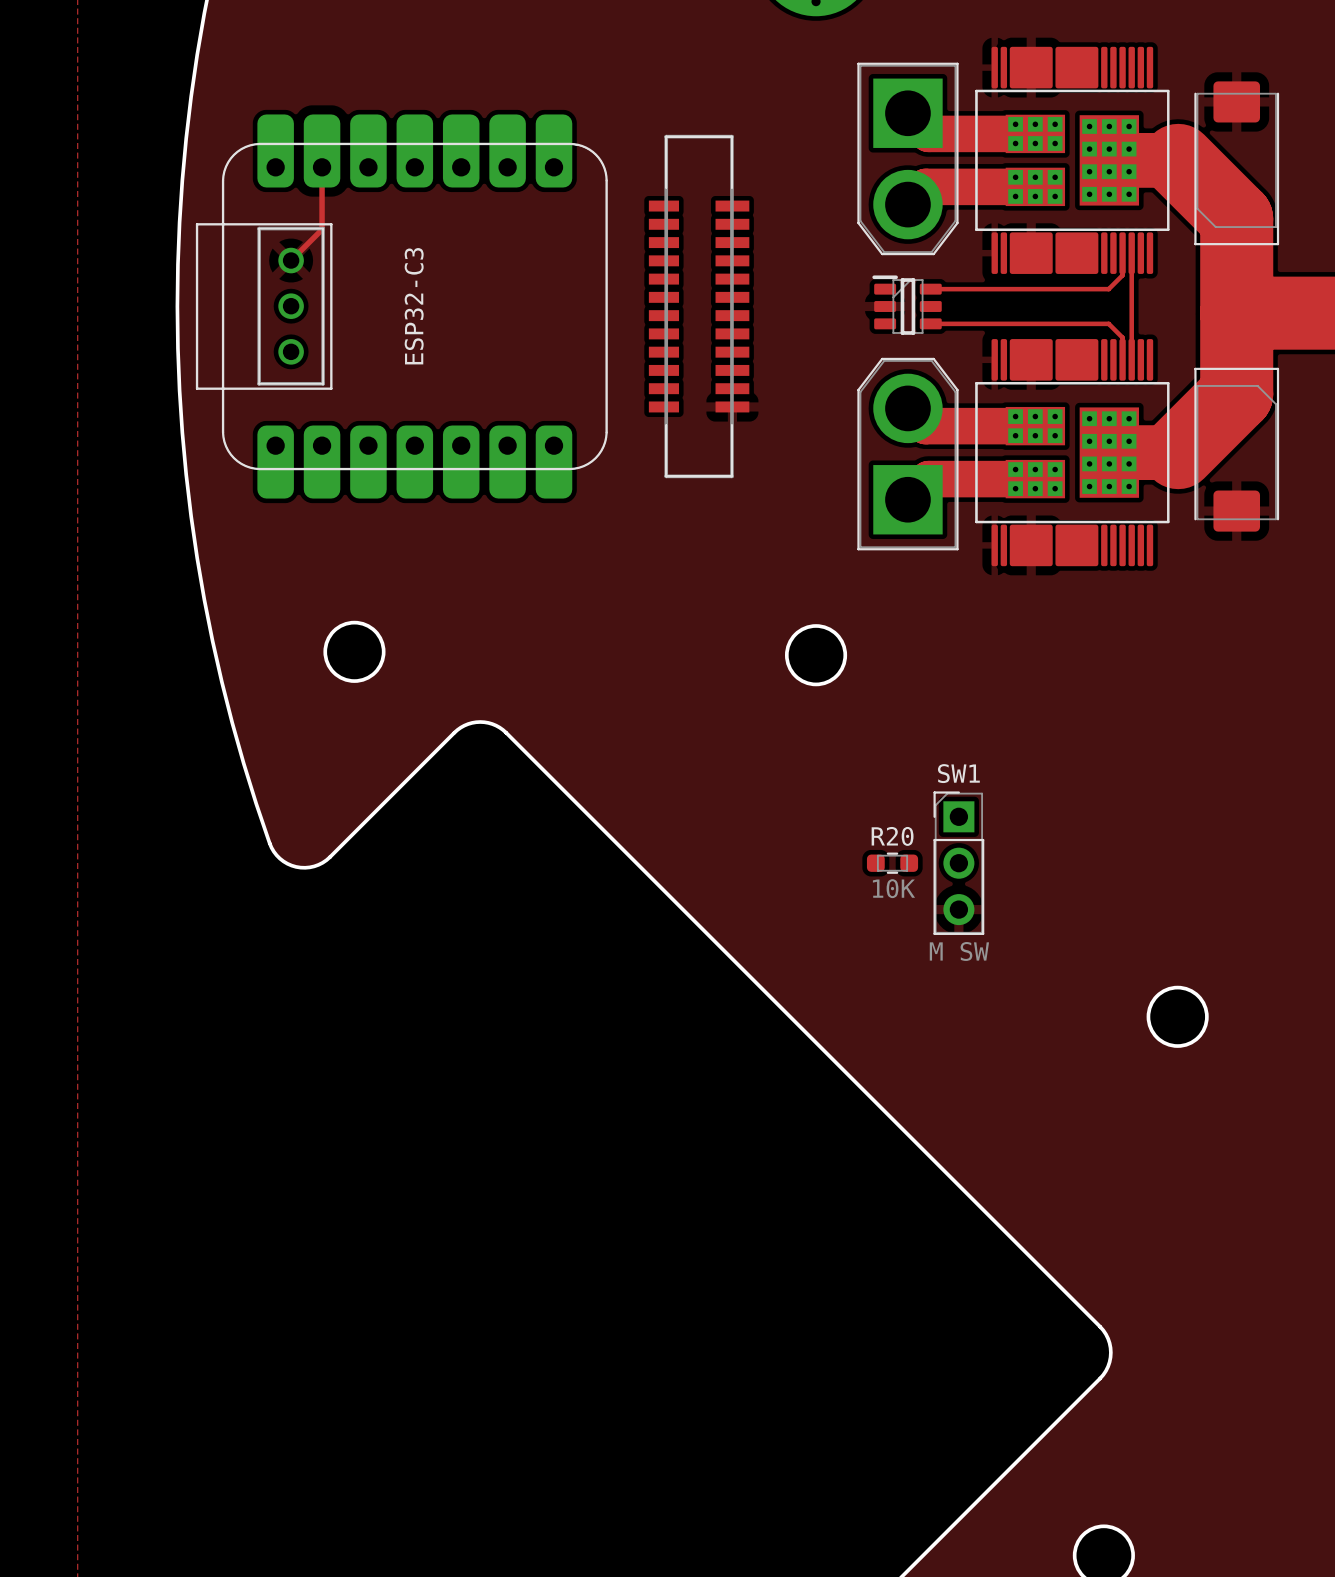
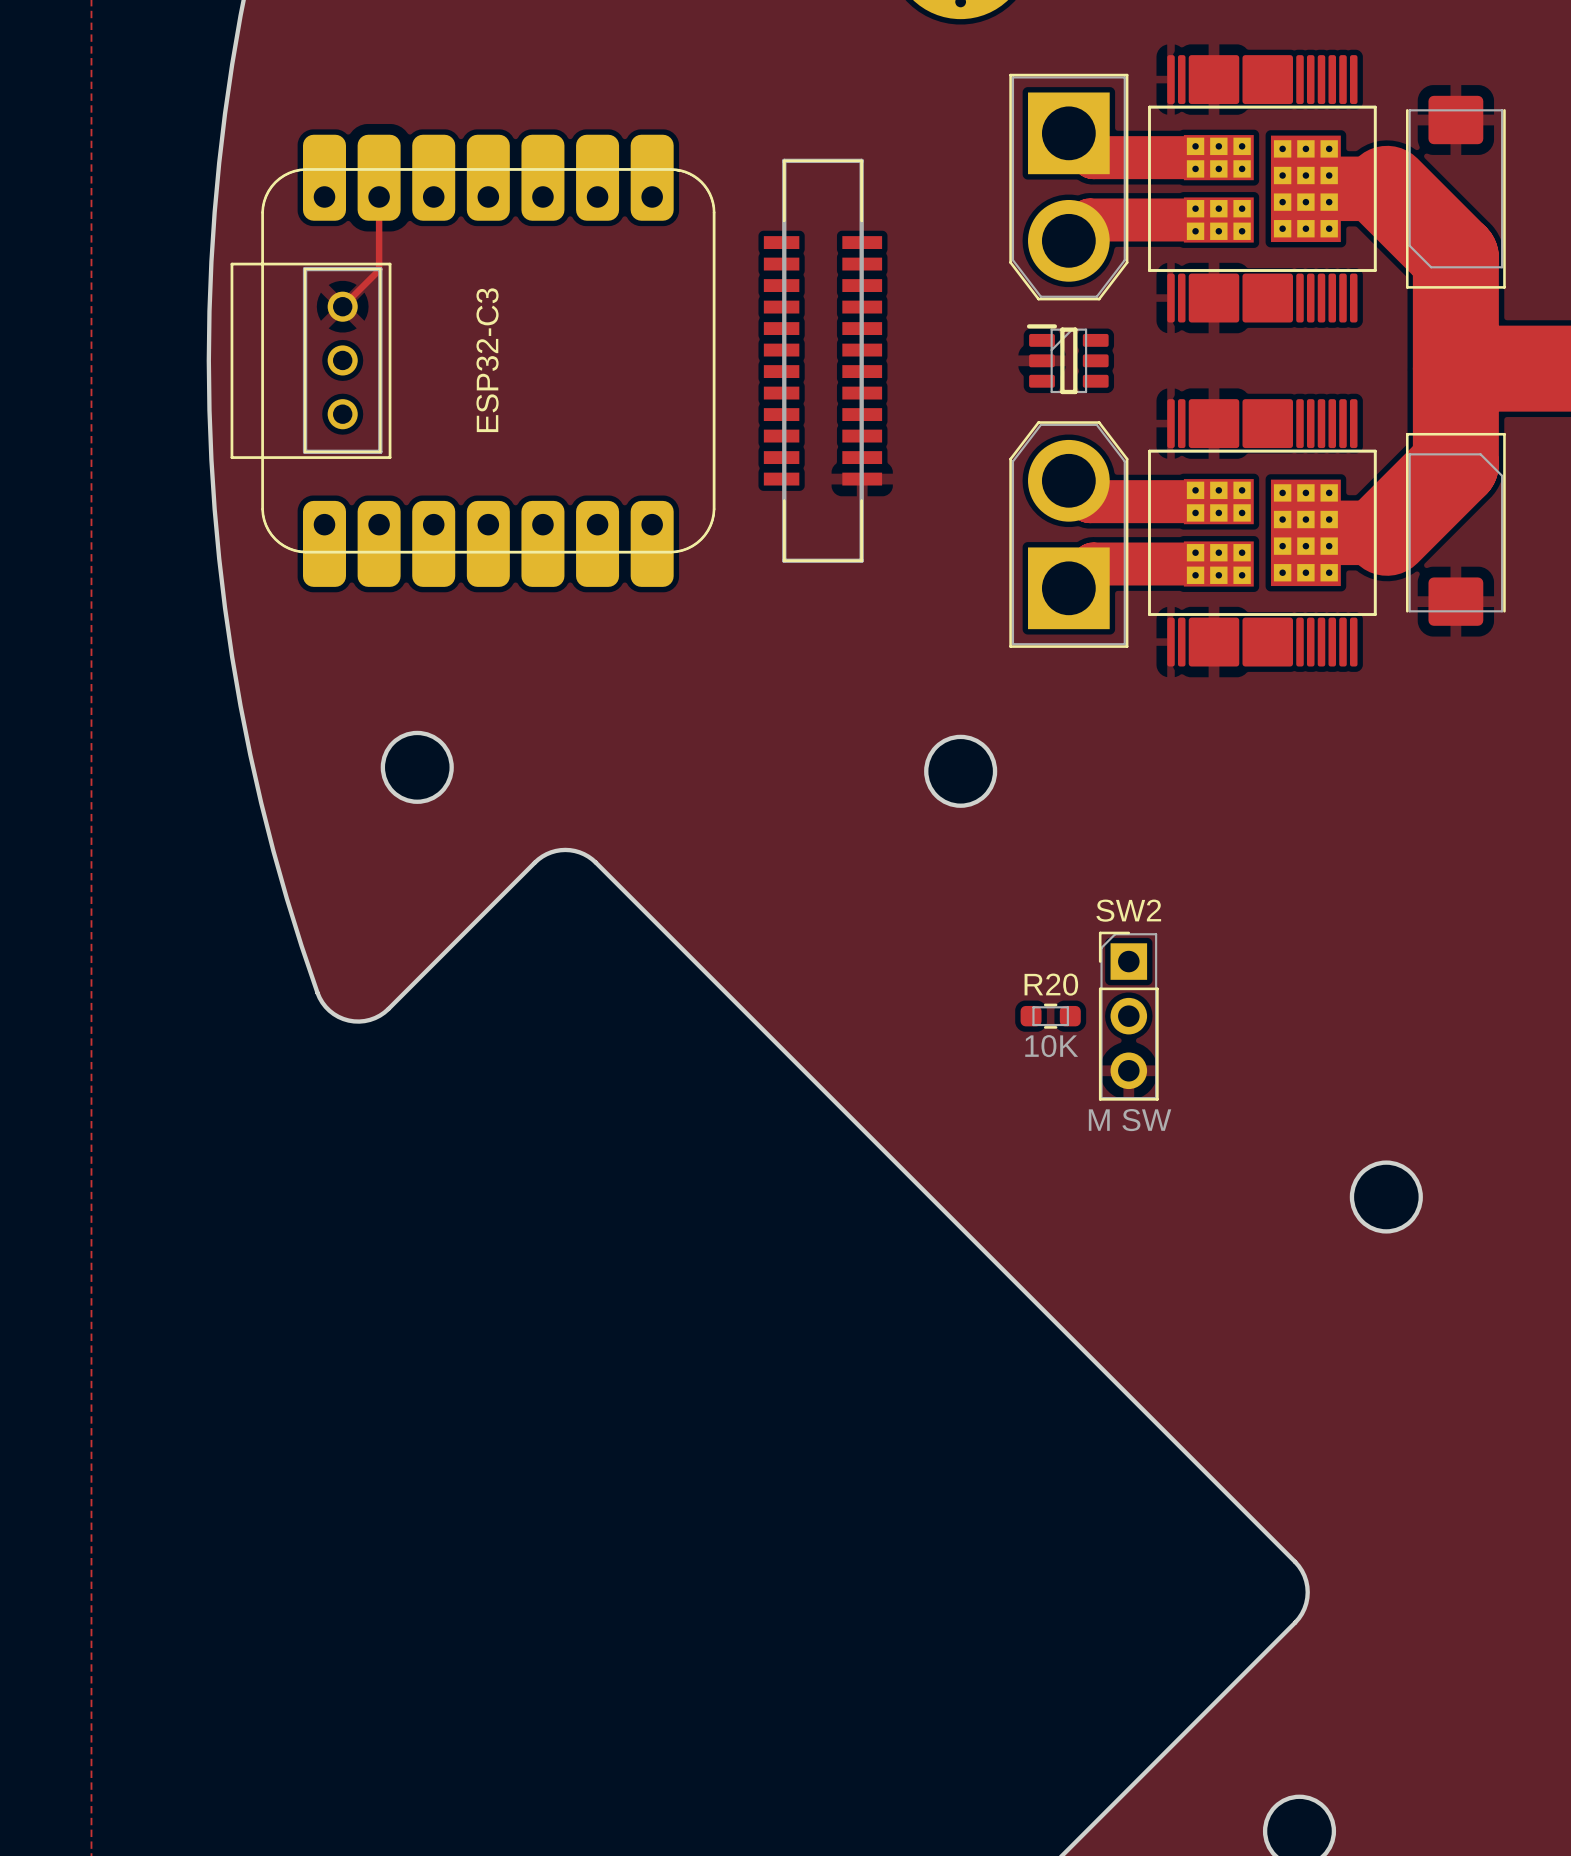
track: (1122, 253) (1122, 275) (1108, 289) (930, 289) -> none
track: (1131, 253) (1131, 359) -> none
track: (930, 323) (1108, 323) (1122, 337) (1122, 359) -> none
SW1 name: SW1 (958, 773) -> SW2 (1128, 910)

